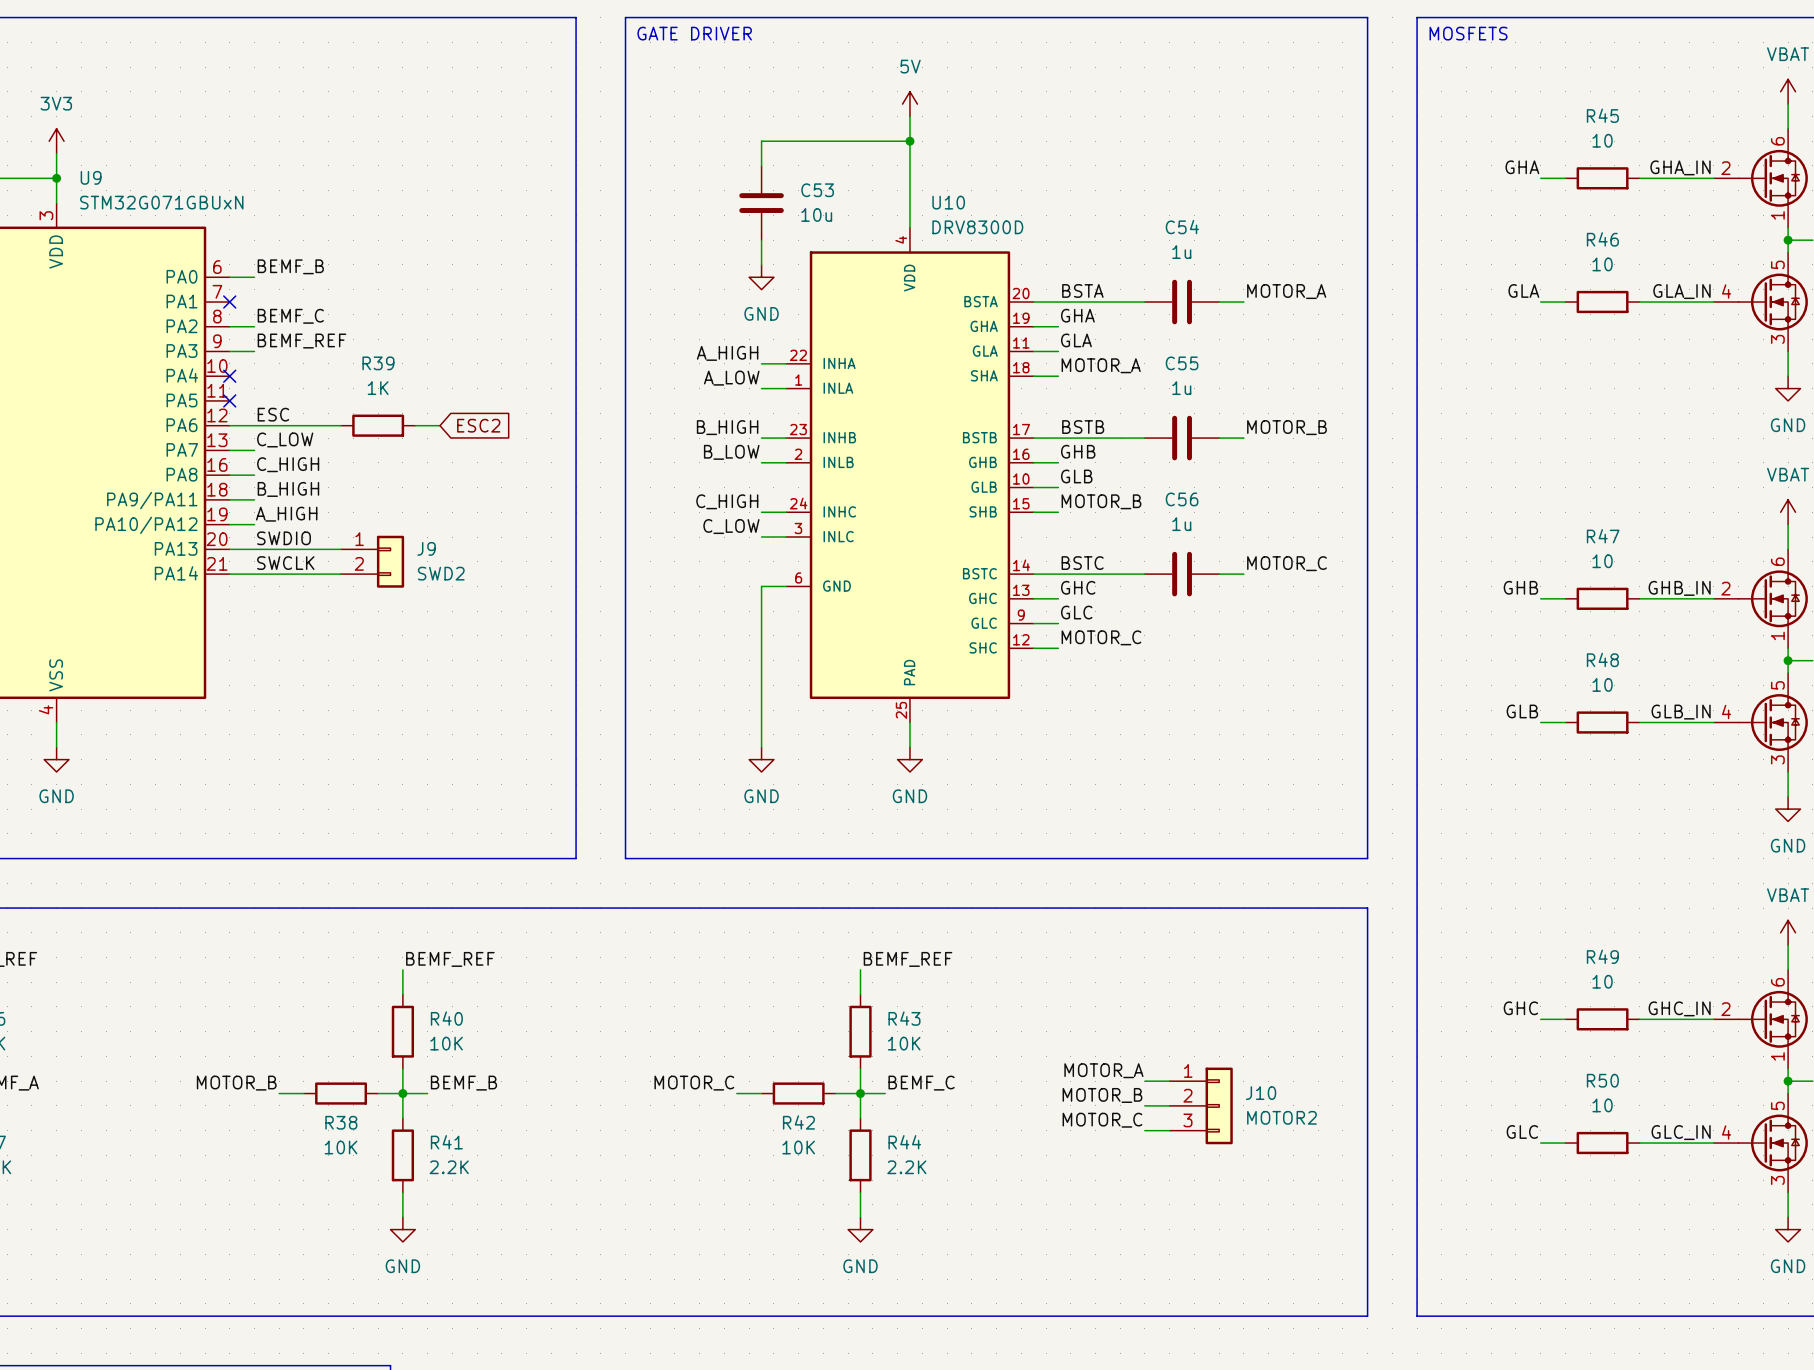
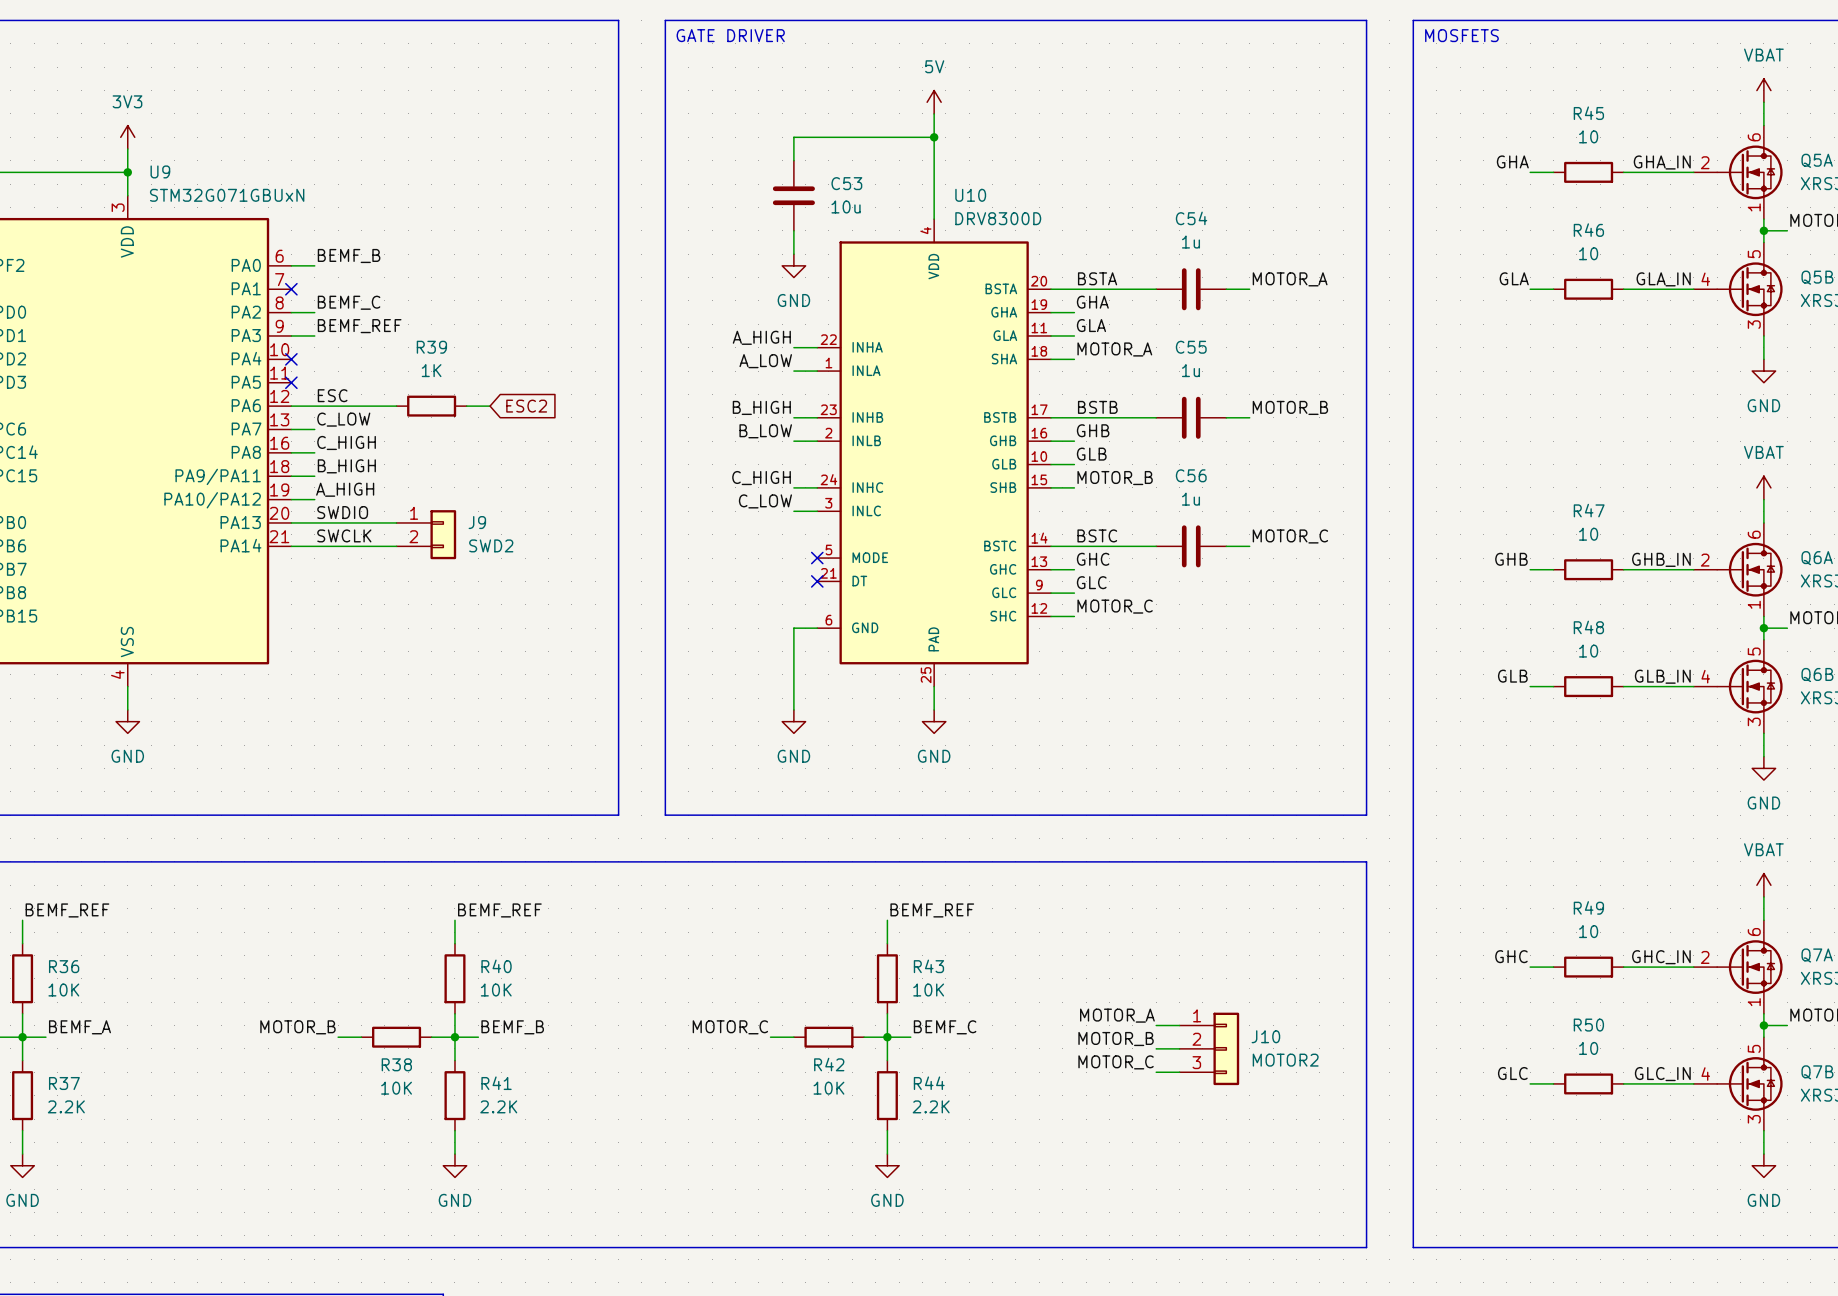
U10 symbol: [786, 227, 1034, 723] -> [817, 219, 1052, 687]
wire: (786, 586) (761, 586) (761, 660) -> (817, 628) (793, 628)
no-connect mark: none -> (817, 558)
no-connect mark: none -> (817, 581)

